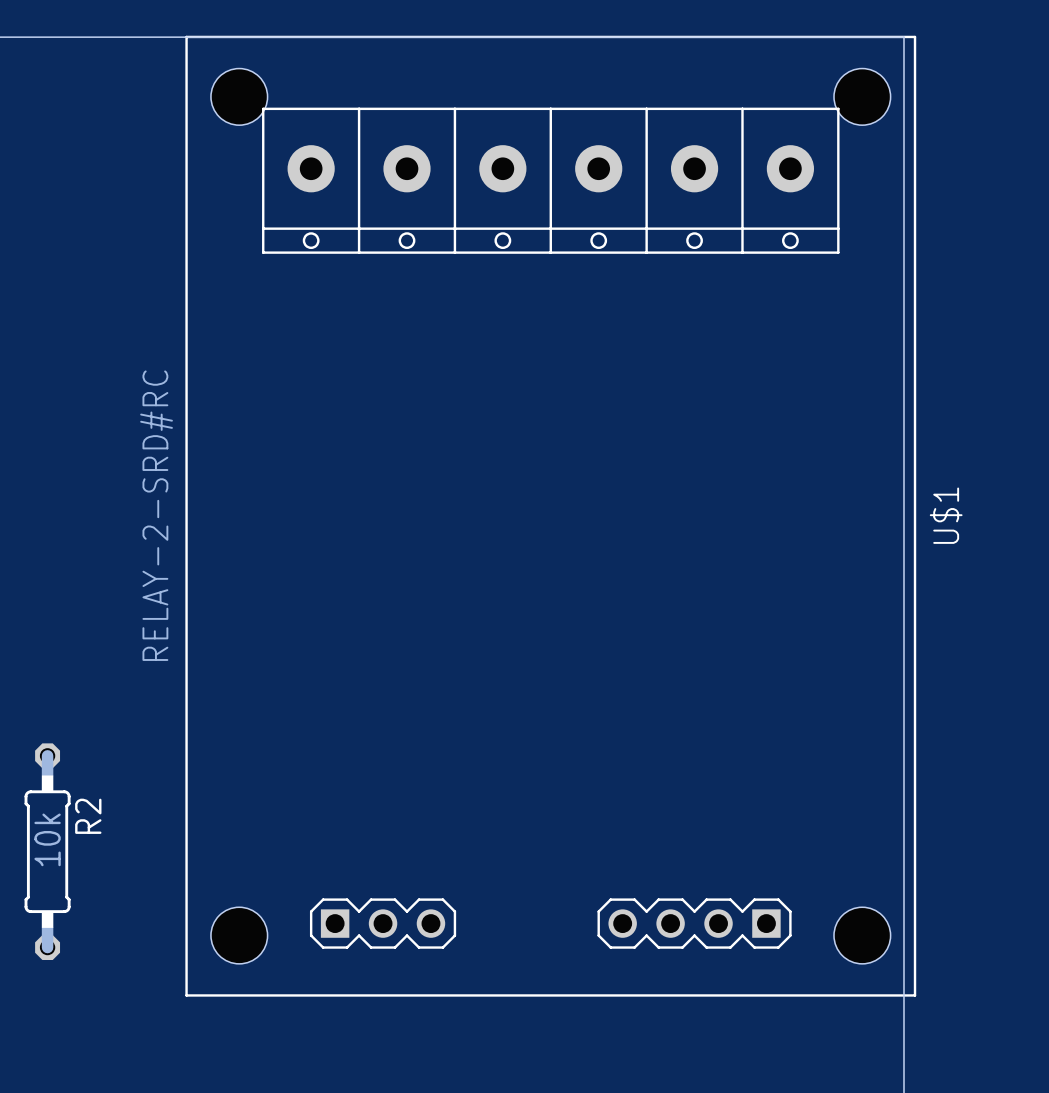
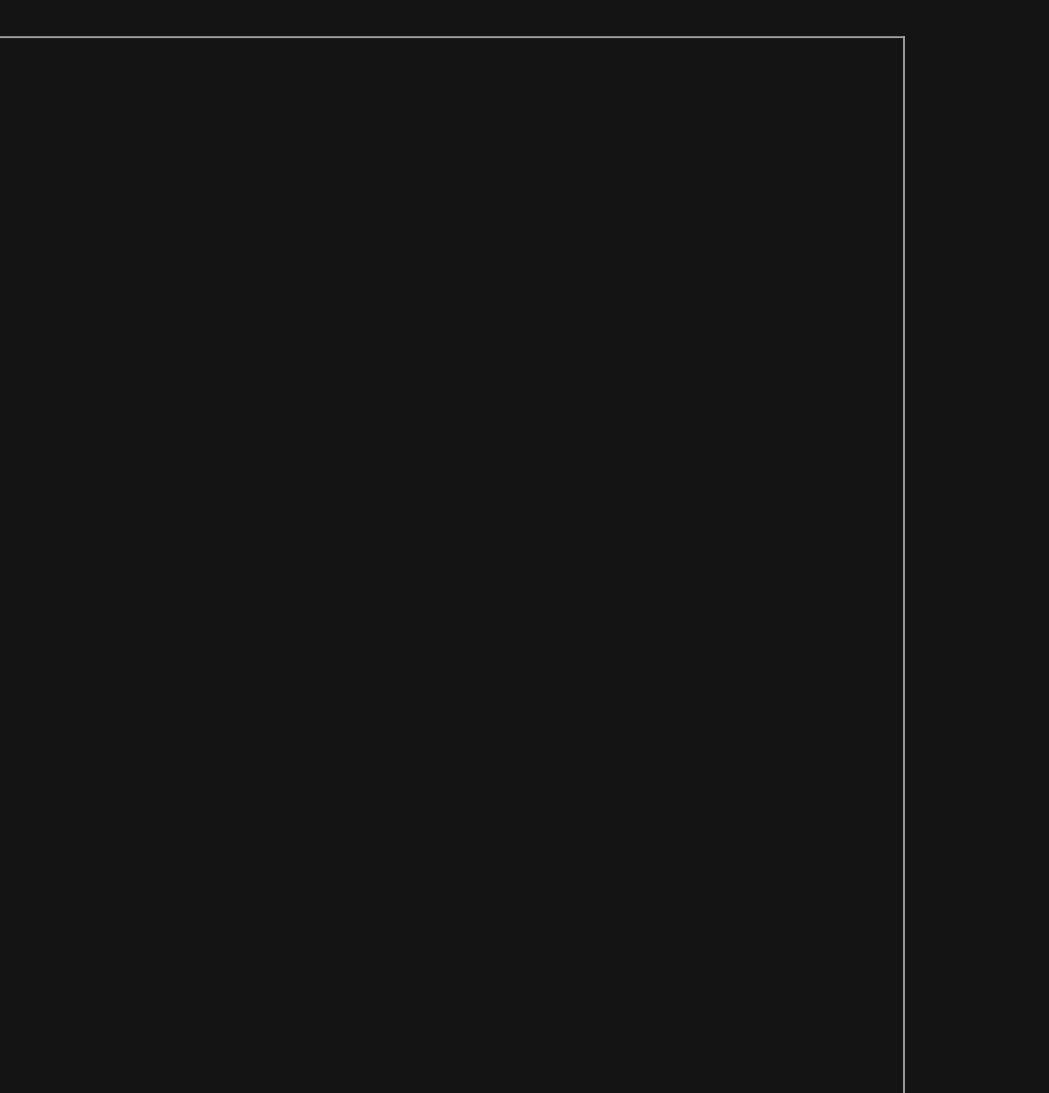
U$1: RELAY-2-SRD#RC (550, 516) -> none
R2: 10k (47, 851) -> none

